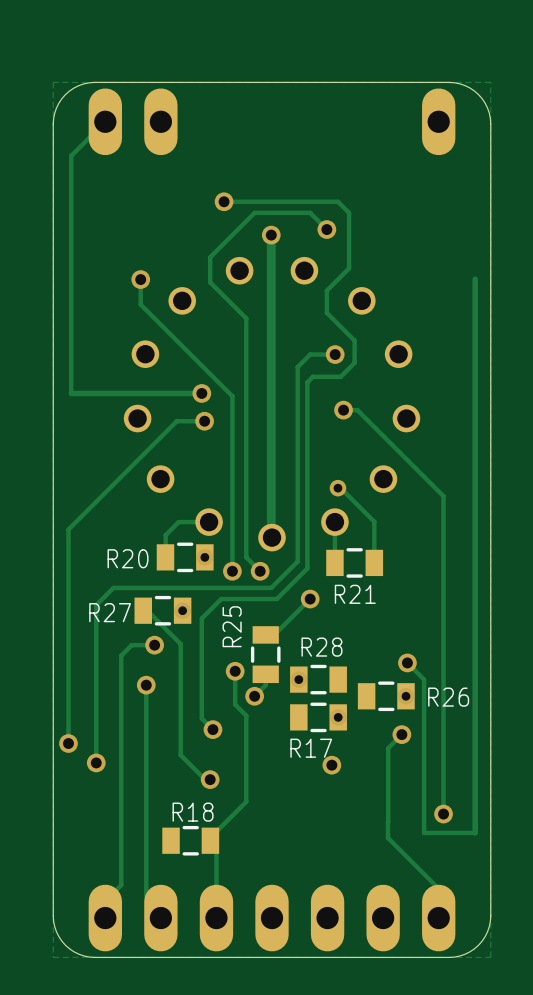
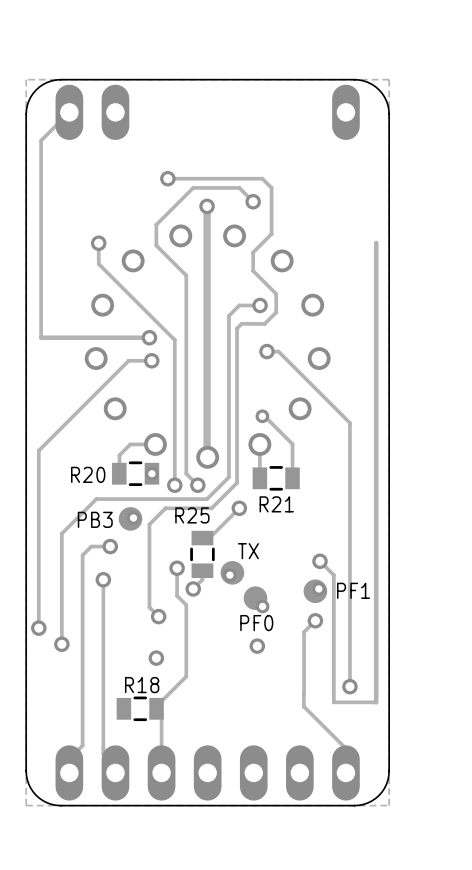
track: (137, 587) (113, 587) (96, 605) (96, 629) -> (96, 499) (61, 533)
track: (143, 610) (147, 610) (180, 644) (180, 755) (205, 779) (210, 779) -> none
R27: (162, 610) -> none
part: none -> (130, 518)
text: none -> PB3 (95, 519)
R25 name rotation: 0° (232, 626) -> 90° clockwise (192, 515)
text: none -> TX (248, 551)
part: none -> (232, 572)
R28: (318, 679) -> none
R26: (386, 696) -> none
text: none -> PF1 (353, 590)
part: none -> (315, 591)
part: none -> (255, 598)
R17: (318, 717) -> none
text: none -> PF0 (256, 623)

